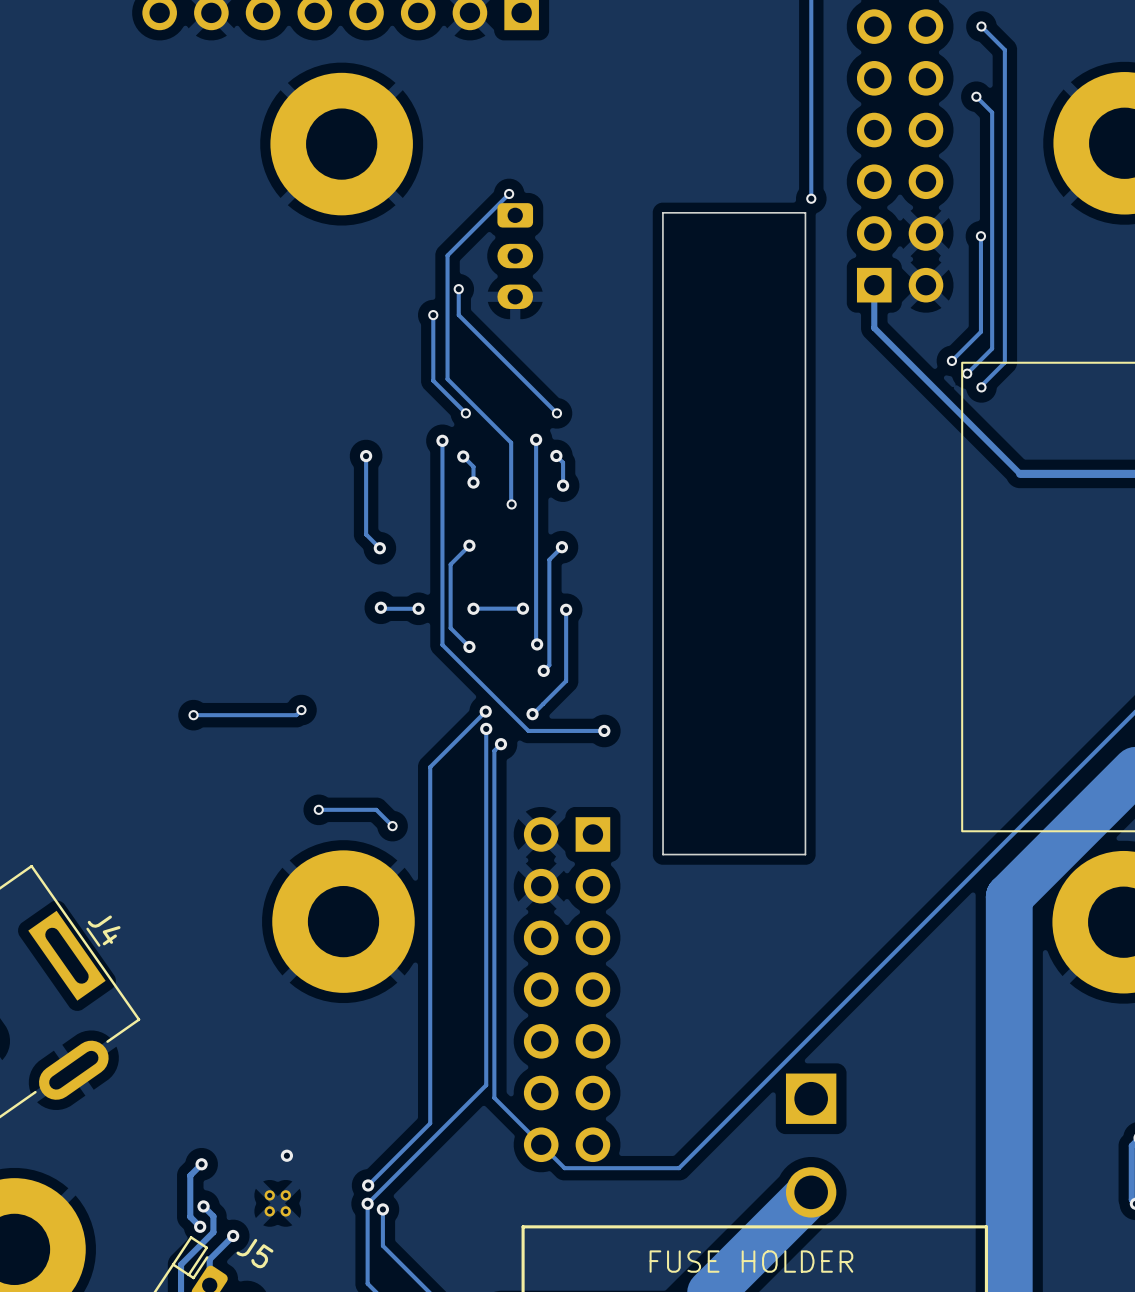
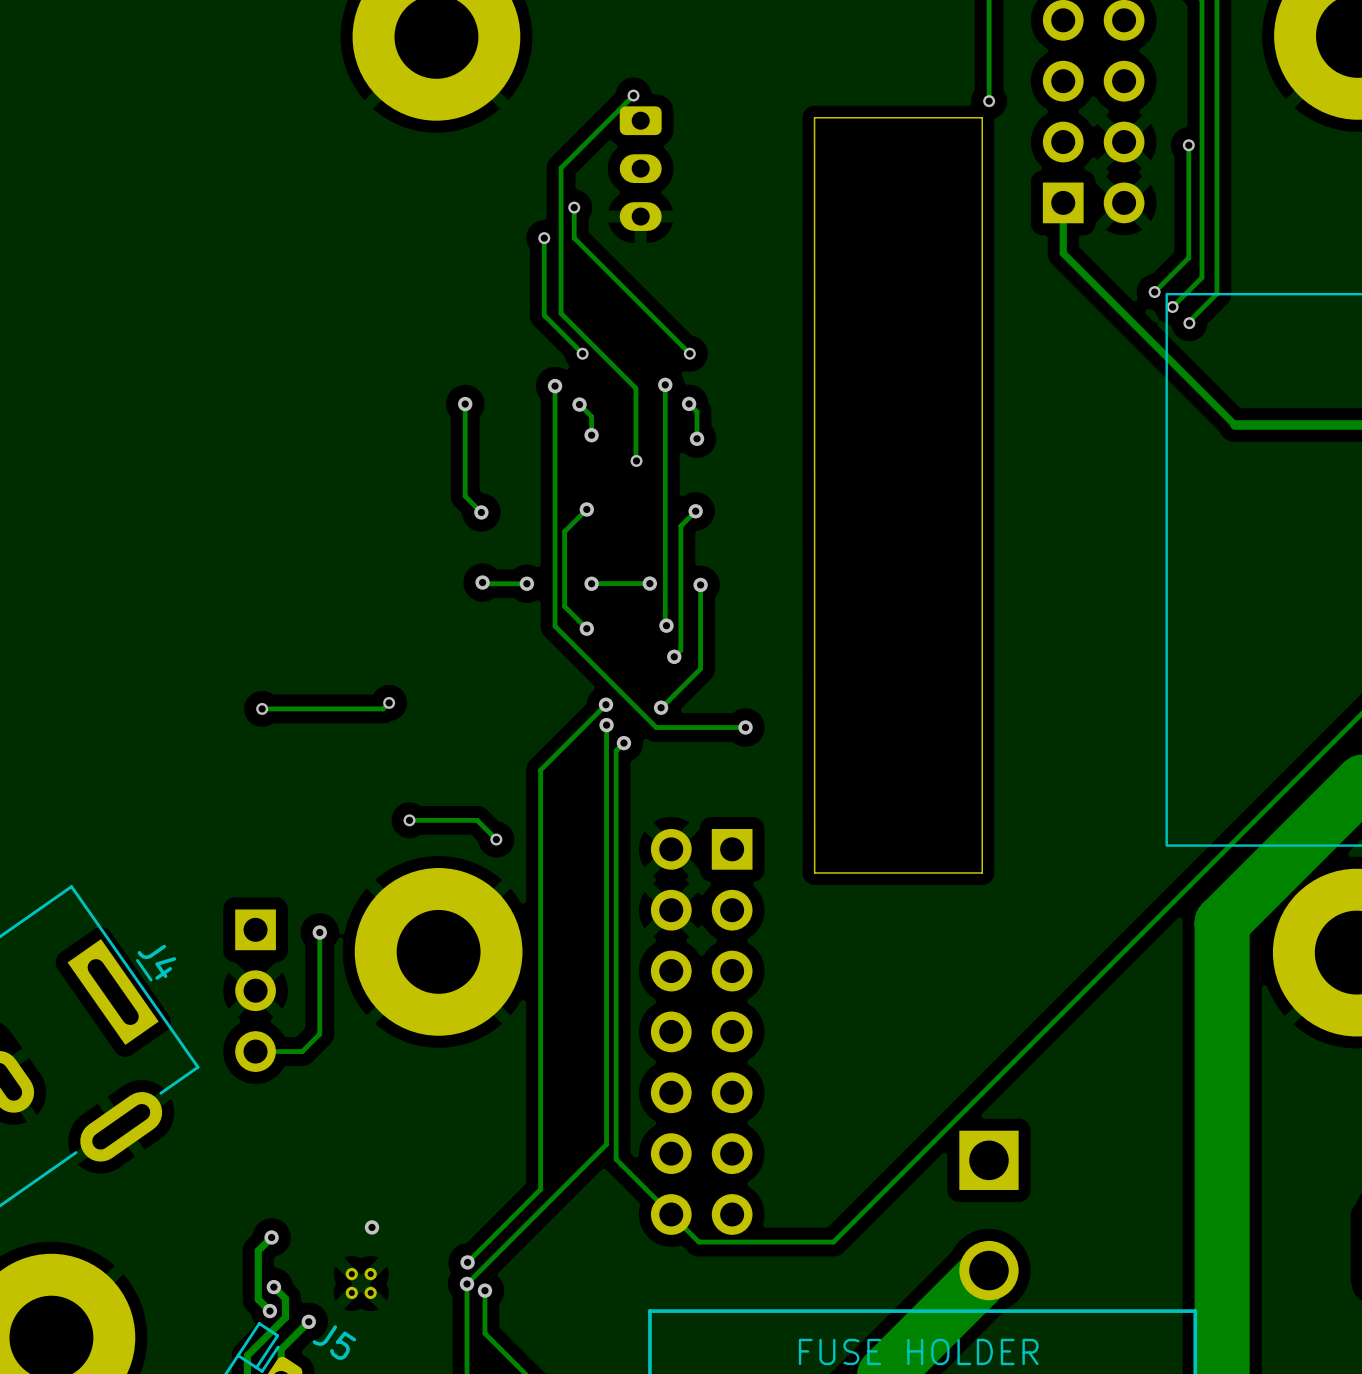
track: none -> (319, 932) (319, 1034) (302, 1051) (255, 1051)
via: none -> (319, 932)
part: none -> (255, 990)

